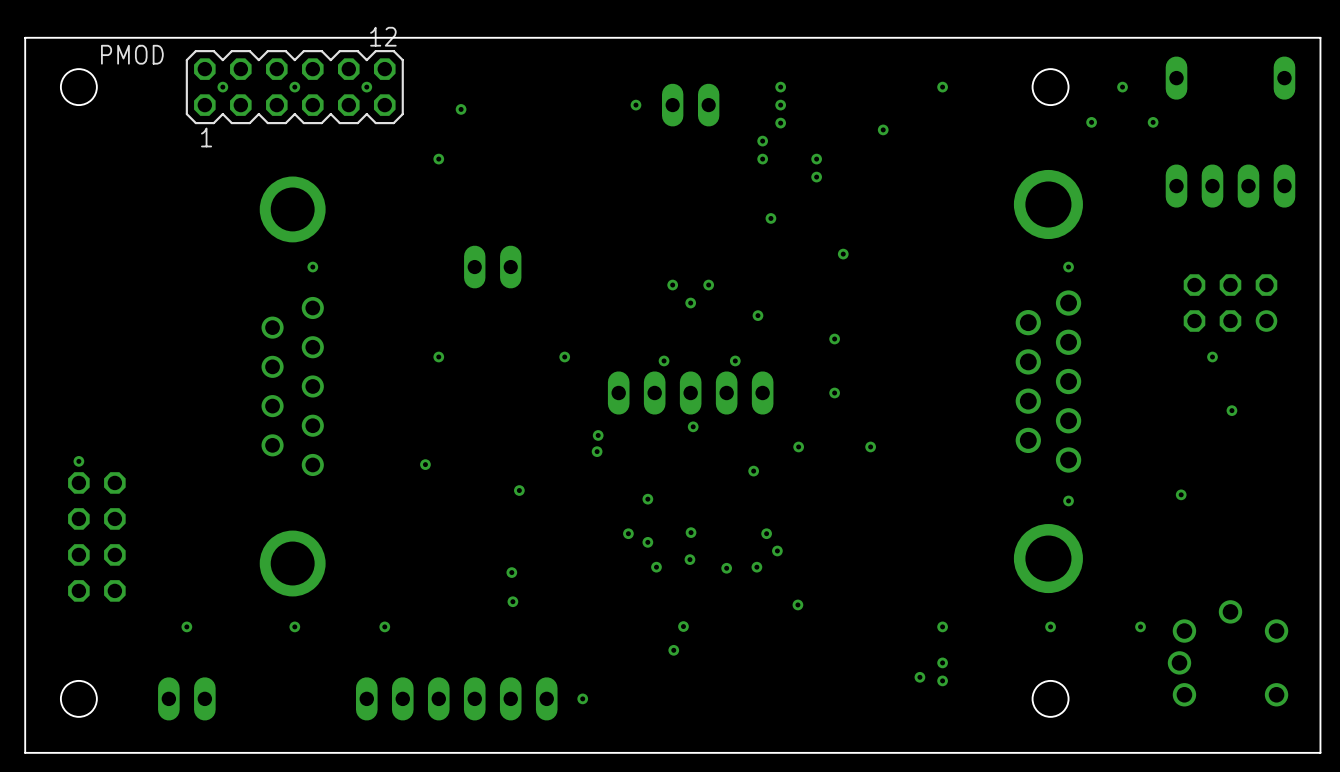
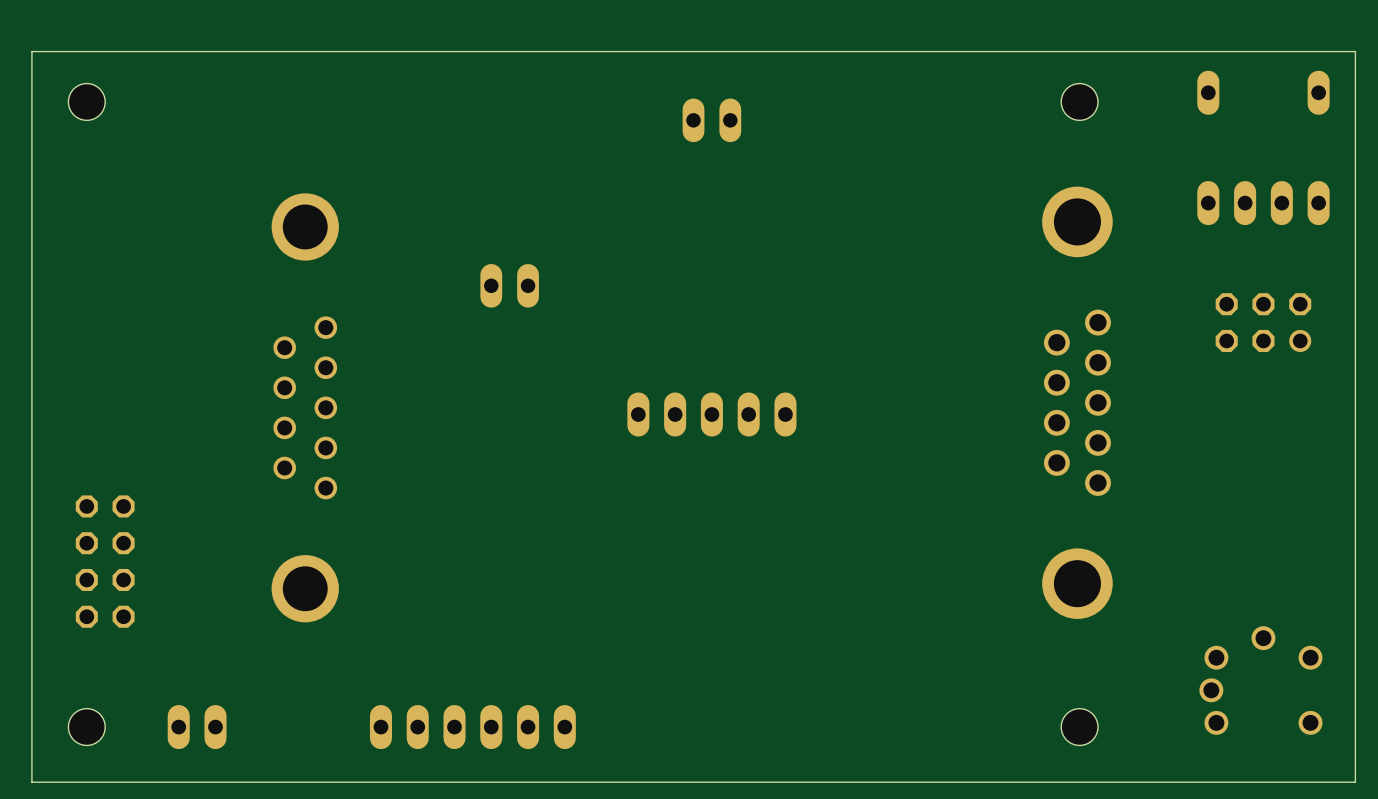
via: (222, 87) -> none
PMOD: (294, 87) -> none
via: (294, 87) -> none
via: (366, 87) -> none
via: (780, 87) -> none
via: (942, 87) -> none
via: (1122, 87) -> none
via: (635, 105) -> none
via: (780, 105) -> none
via: (461, 109) -> none
via: (1091, 122) -> none
via: (1153, 122) -> none
via: (780, 123) -> none
via: (883, 129) -> none
via: (762, 141) -> none
via: (438, 159) -> none
via: (762, 159) -> none
via: (816, 159) -> none
via: (816, 177) -> none
via: (770, 218) -> none
via: (843, 254) -> none
via: (312, 267) -> none
via: (1068, 267) -> none
via: (672, 285) -> none
via: (708, 285) -> none
via: (690, 303) -> none
via: (757, 315) -> none
via: (834, 339) -> none
via: (438, 357) -> none
via: (564, 357) -> none
via: (1212, 357) -> none
via: (664, 360) -> none
via: (735, 360) -> none
via: (834, 392) -> none
via: (1231, 410) -> none
via: (693, 426) -> none
via: (598, 435) -> none
via: (798, 446) -> none
via: (870, 446) -> none
via: (597, 451) -> none
via: (78, 461) -> none
via: (425, 464) -> none
via: (753, 471) -> none
via: (519, 490) -> none
via: (1181, 494) -> none
via: (647, 499) -> none
via: (1068, 500) -> none
via: (691, 532) -> none
via: (628, 533) -> none
via: (766, 533) -> none
via: (647, 542) -> none
via: (777, 550) -> none
via: (689, 559) -> none
via: (656, 567) -> none
via: (756, 567) -> none
via: (726, 568) -> none
via: (511, 572) -> none
via: (512, 601) -> none
via: (797, 604) -> none
via: (186, 626) -> none
via: (294, 626) -> none
via: (384, 626) -> none
via: (683, 626) -> none
via: (942, 626) -> none
via: (1050, 626) -> none
via: (1140, 626) -> none
via: (673, 650) -> none
via: (942, 662) -> none
via: (919, 677) -> none
via: (942, 680) -> none
via: (582, 698) -> none

